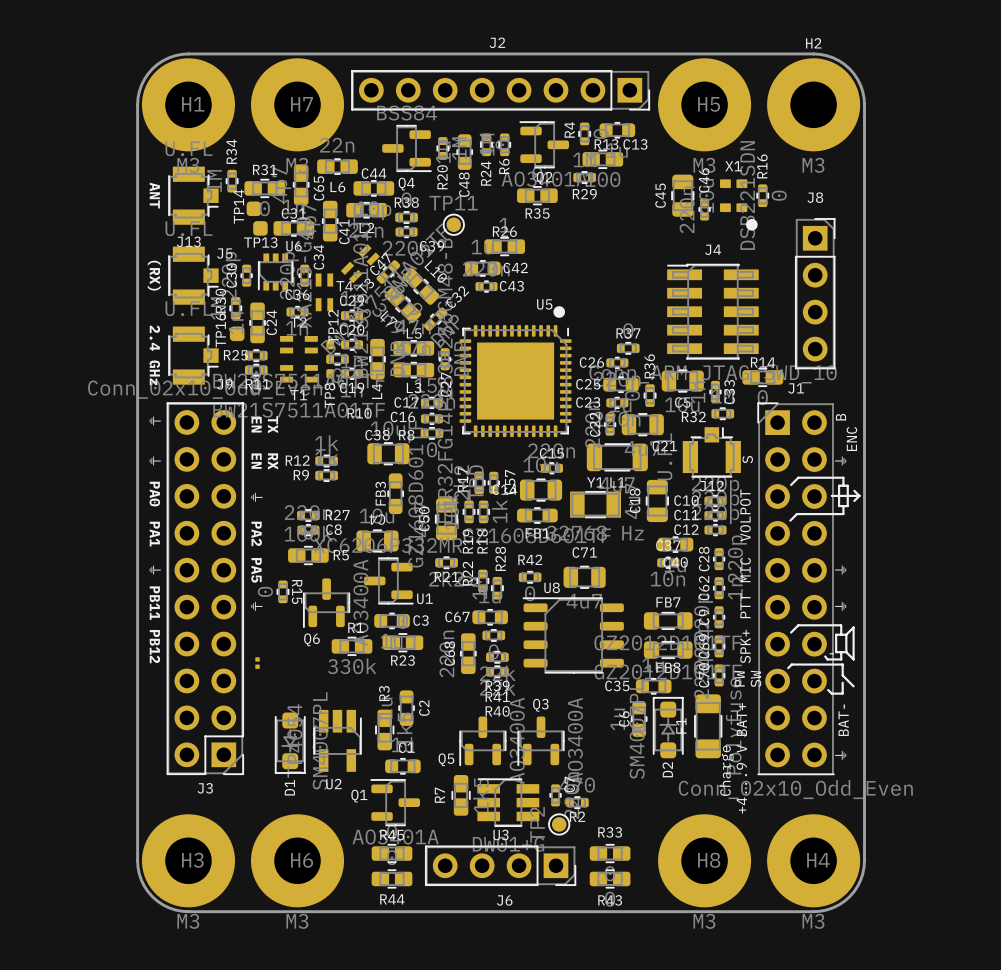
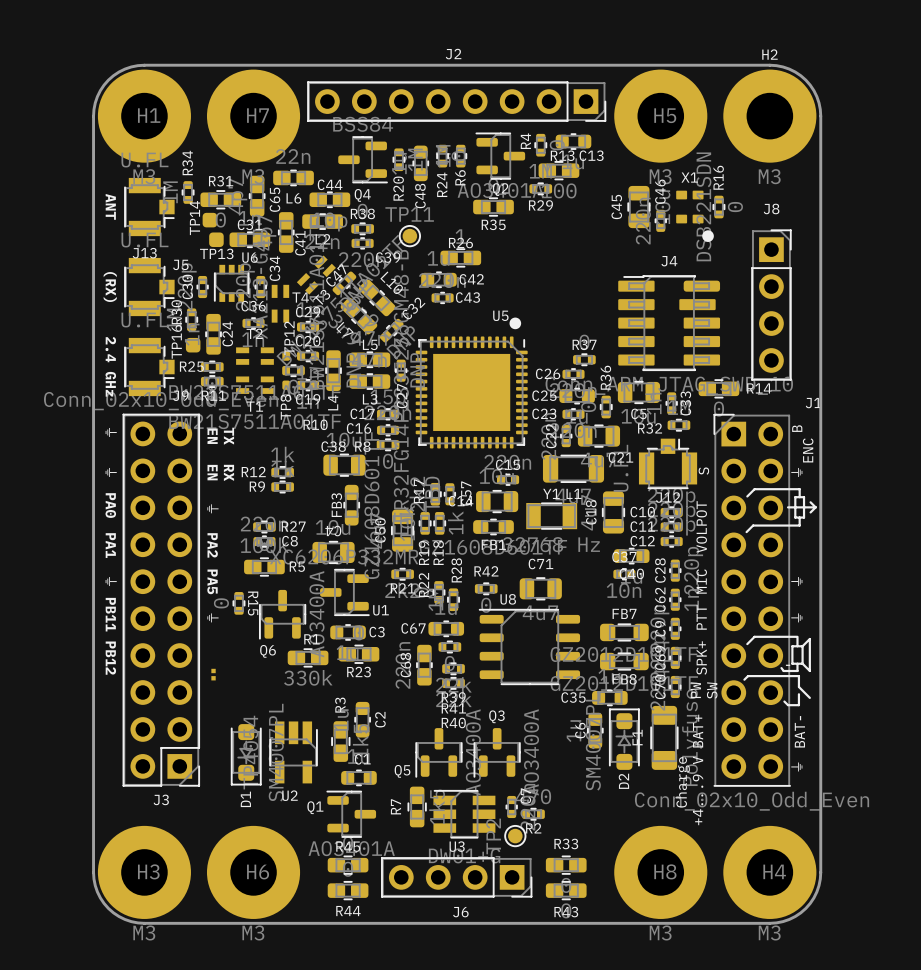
J4 footprint: [667, 263, 759, 360] -> [618, 275, 721, 372]
R14 name position: R14 (763, 362) -> R14 (759, 388)
J1 name position: J1 (796, 388) -> J1 (813, 403)

